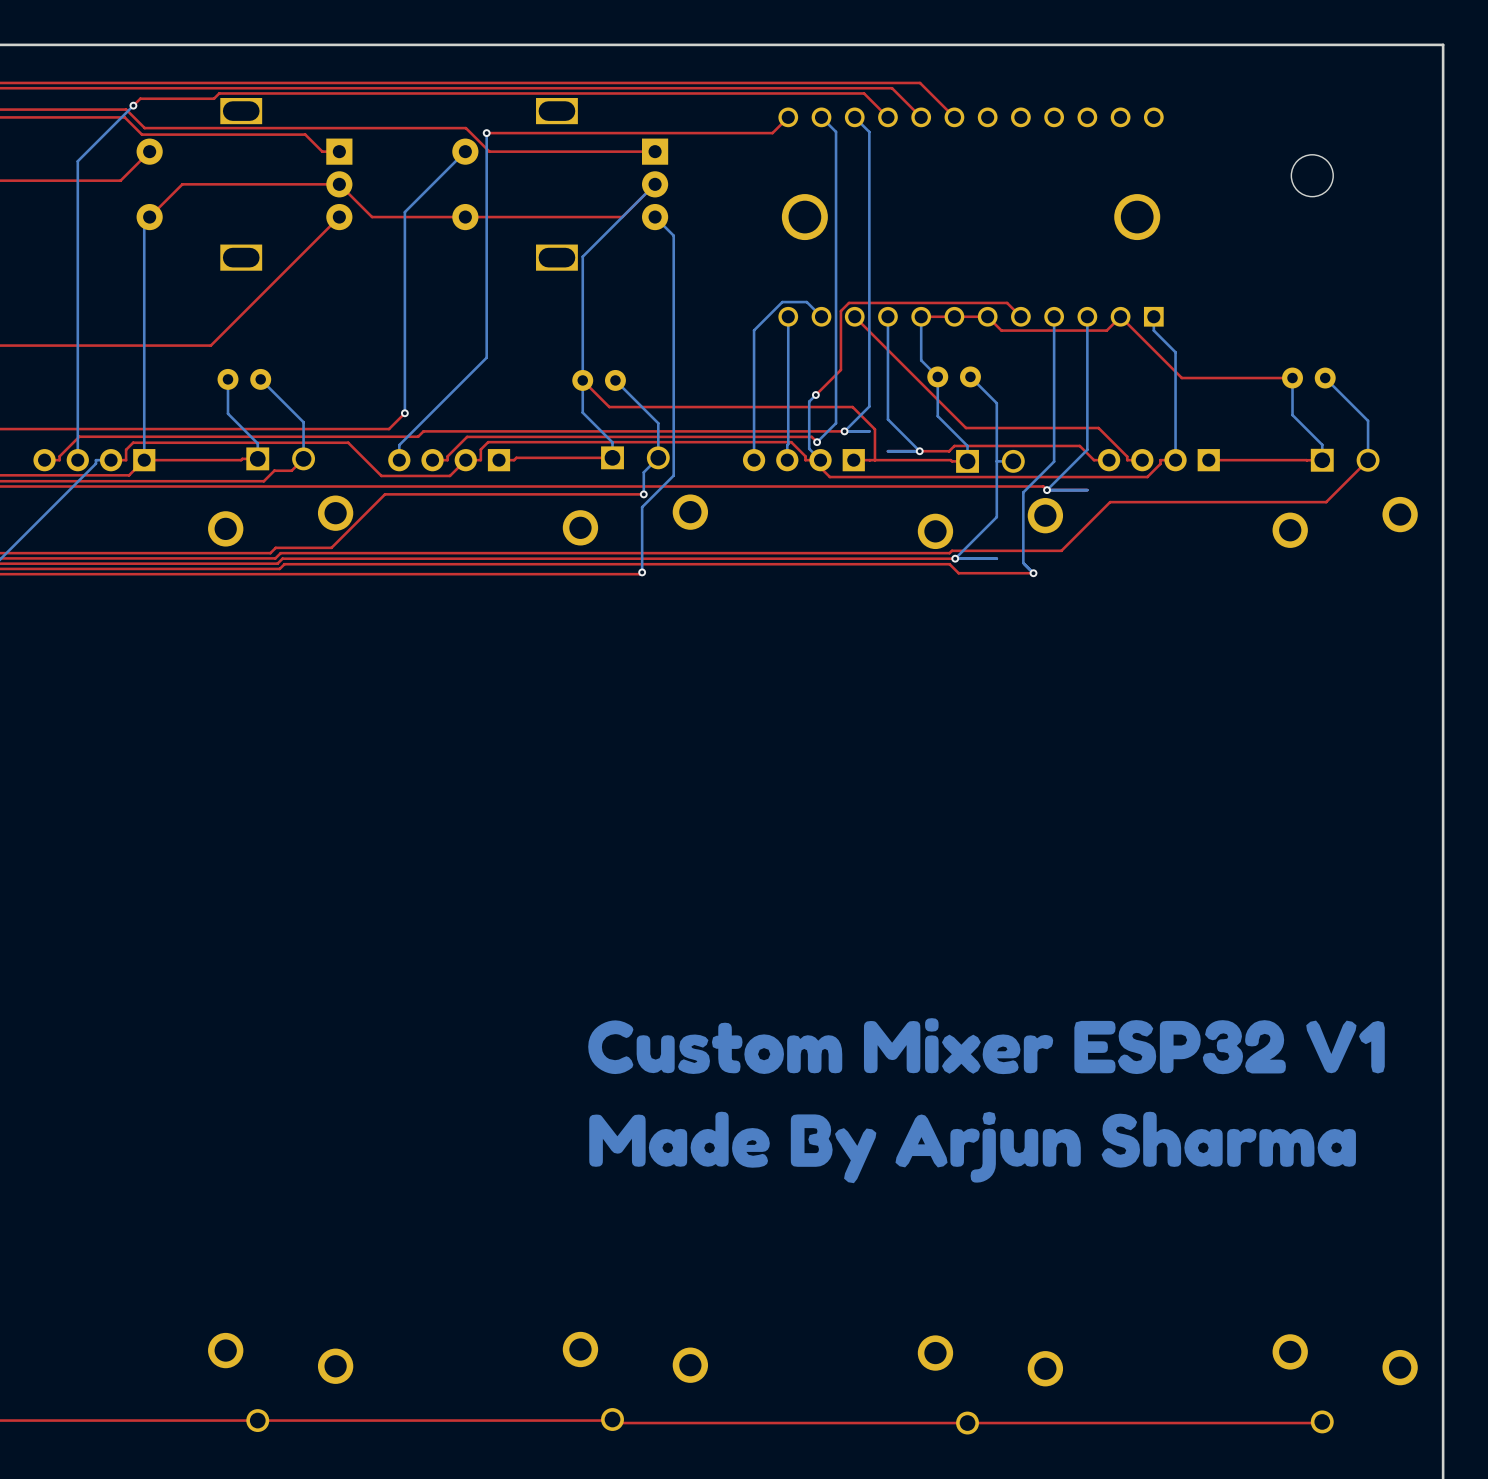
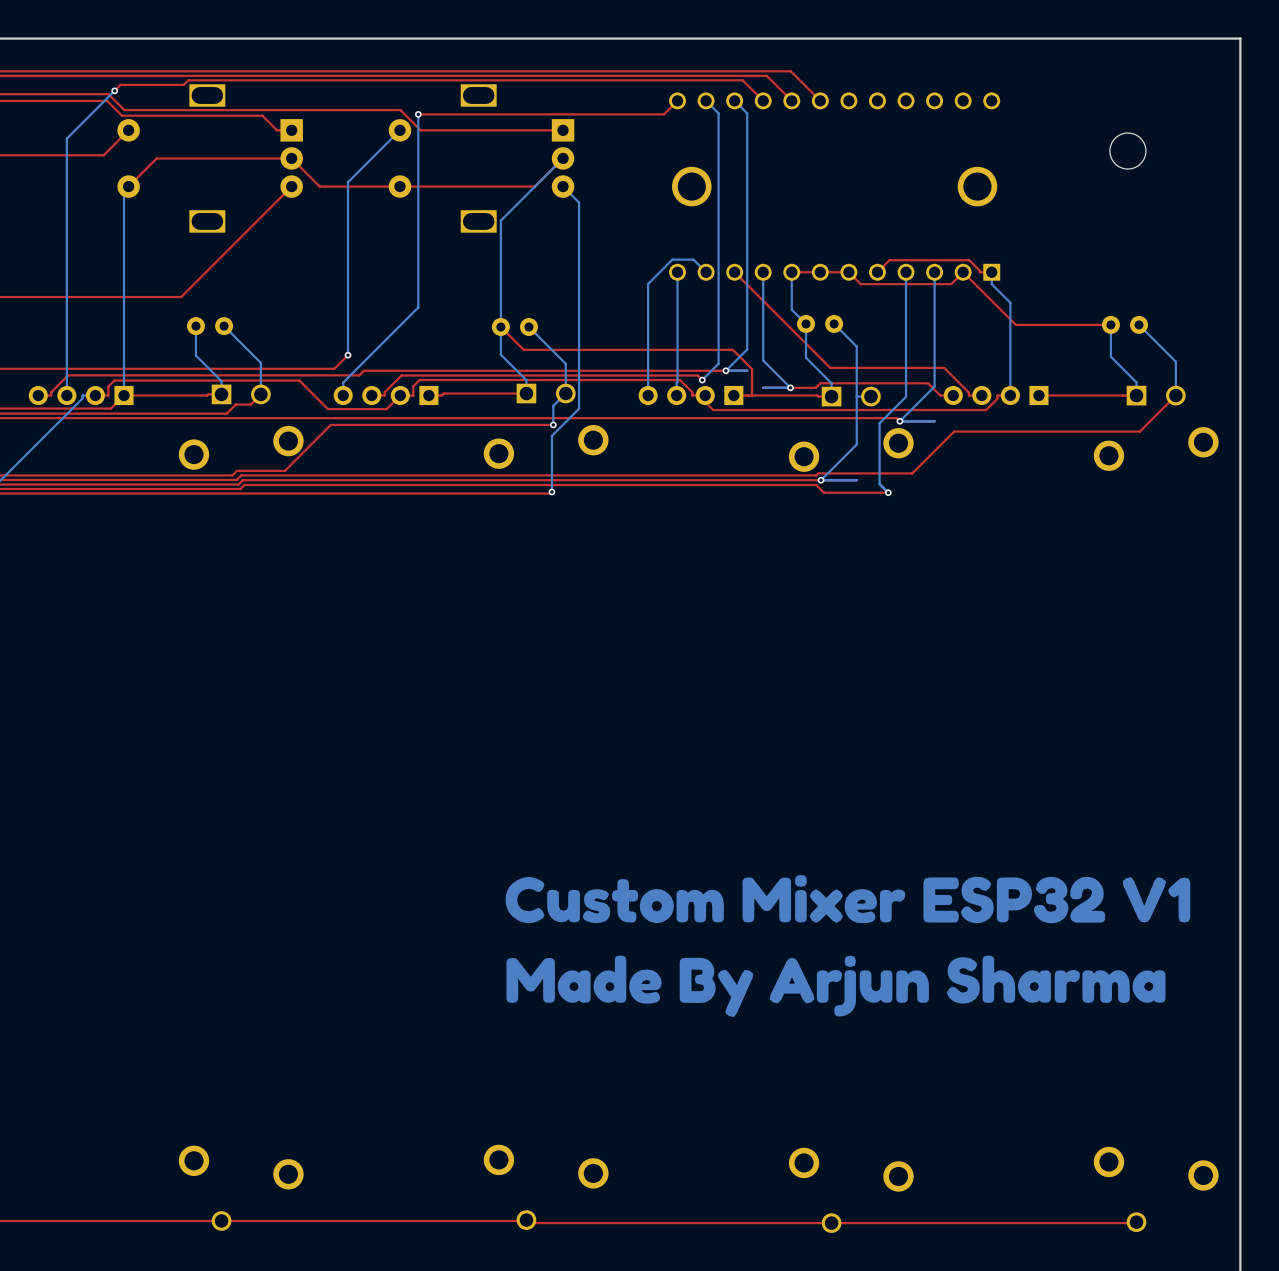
top track: (1020, 316) (1007, 302) (849, 302) (840, 311) (840, 369) (815, 395) -> (877, 272) (889, 260) (969, 260) (979, 272) (991, 272)
bottom track: (815, 395) (809, 401) (809, 448) (820, 460) -> none
via: (815, 395) -> none

